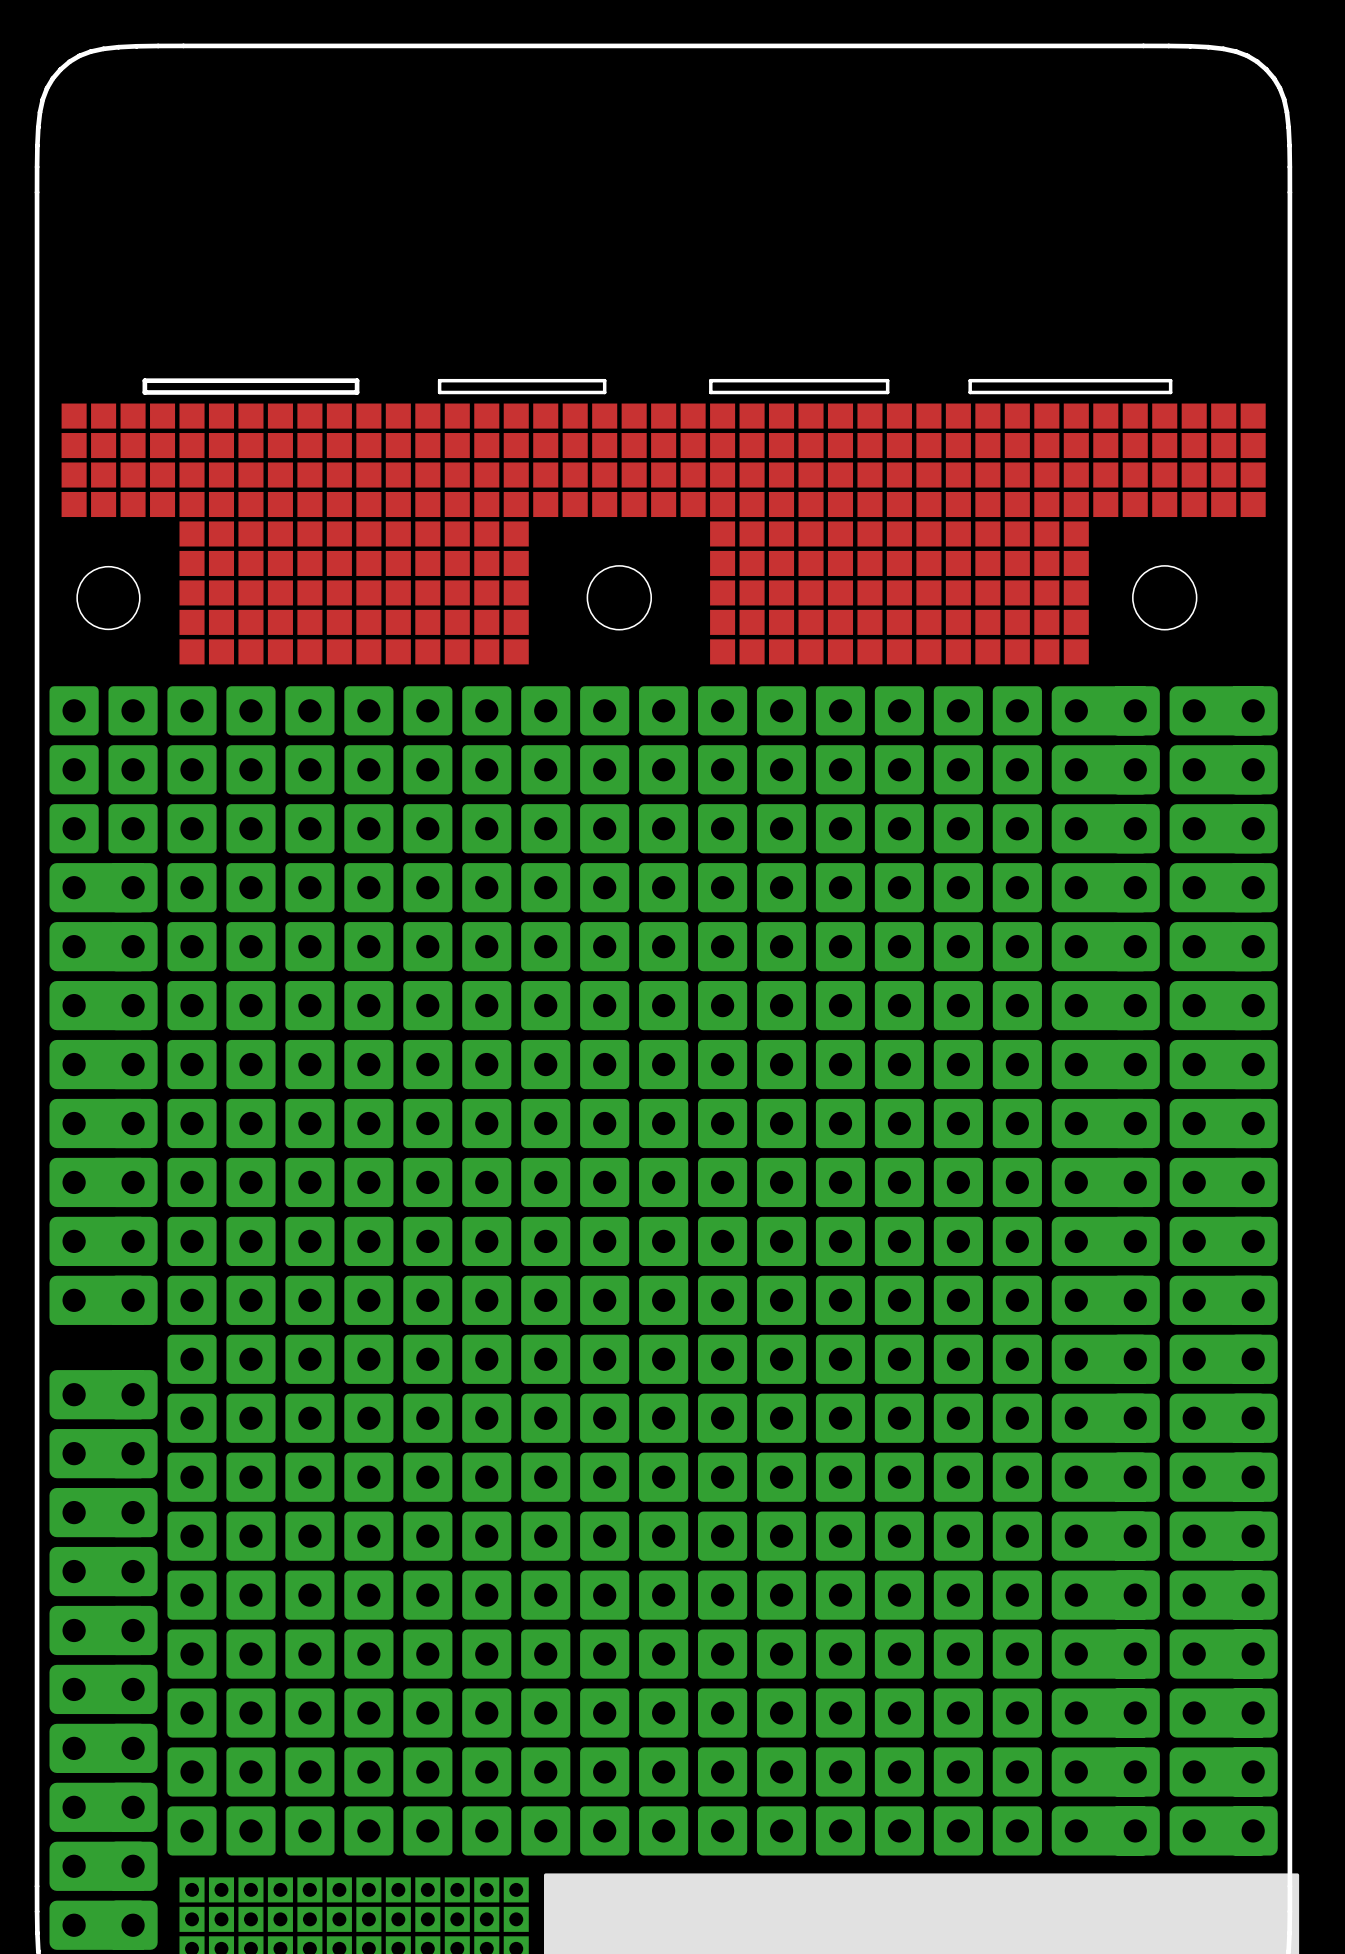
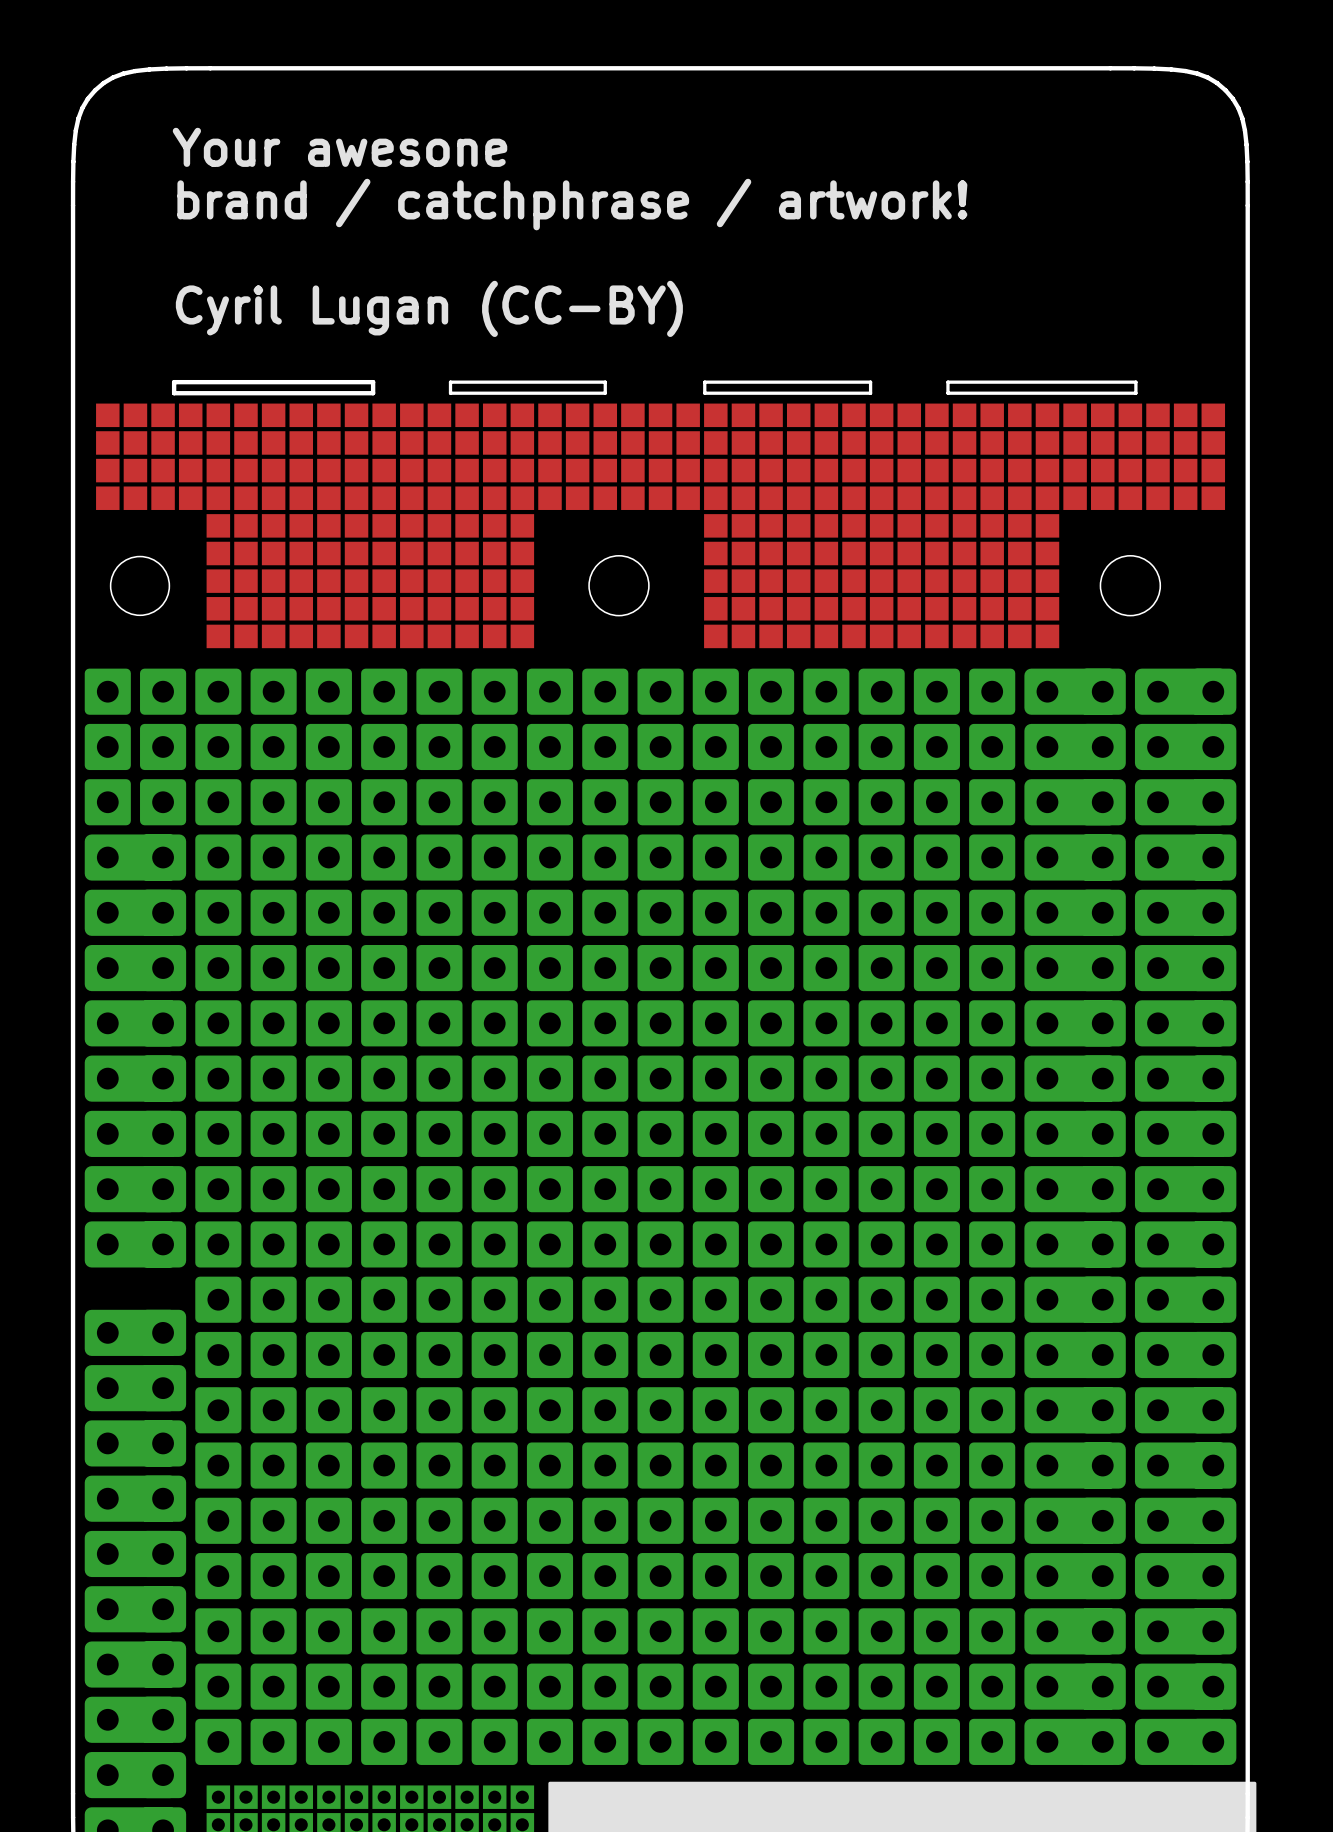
text: none -> Your awesone (339, 147)
text: none -> brand / catchphrase / artwork! (572, 204)
text: none -> Cyril Lugan (CC-BY) (429, 308)

